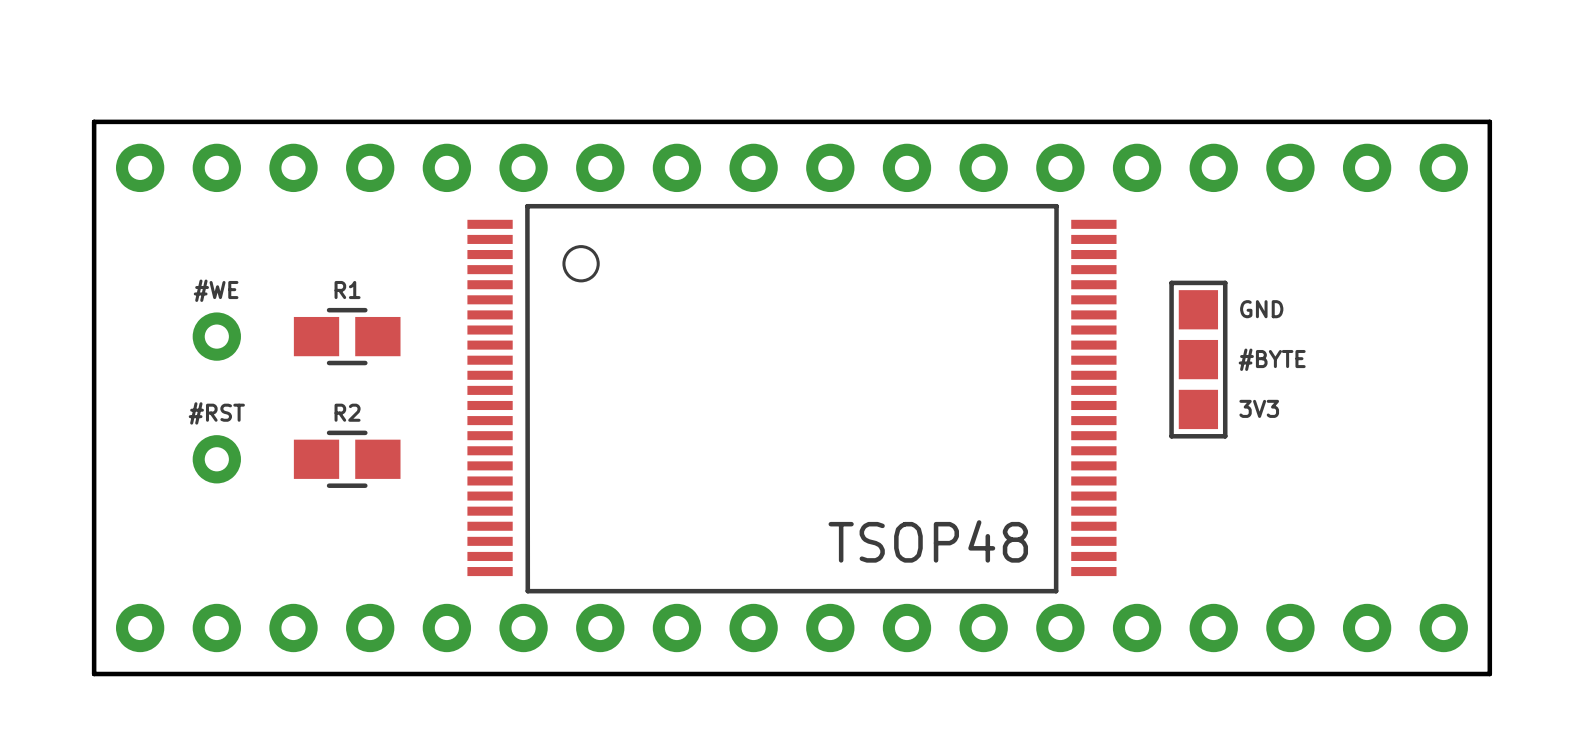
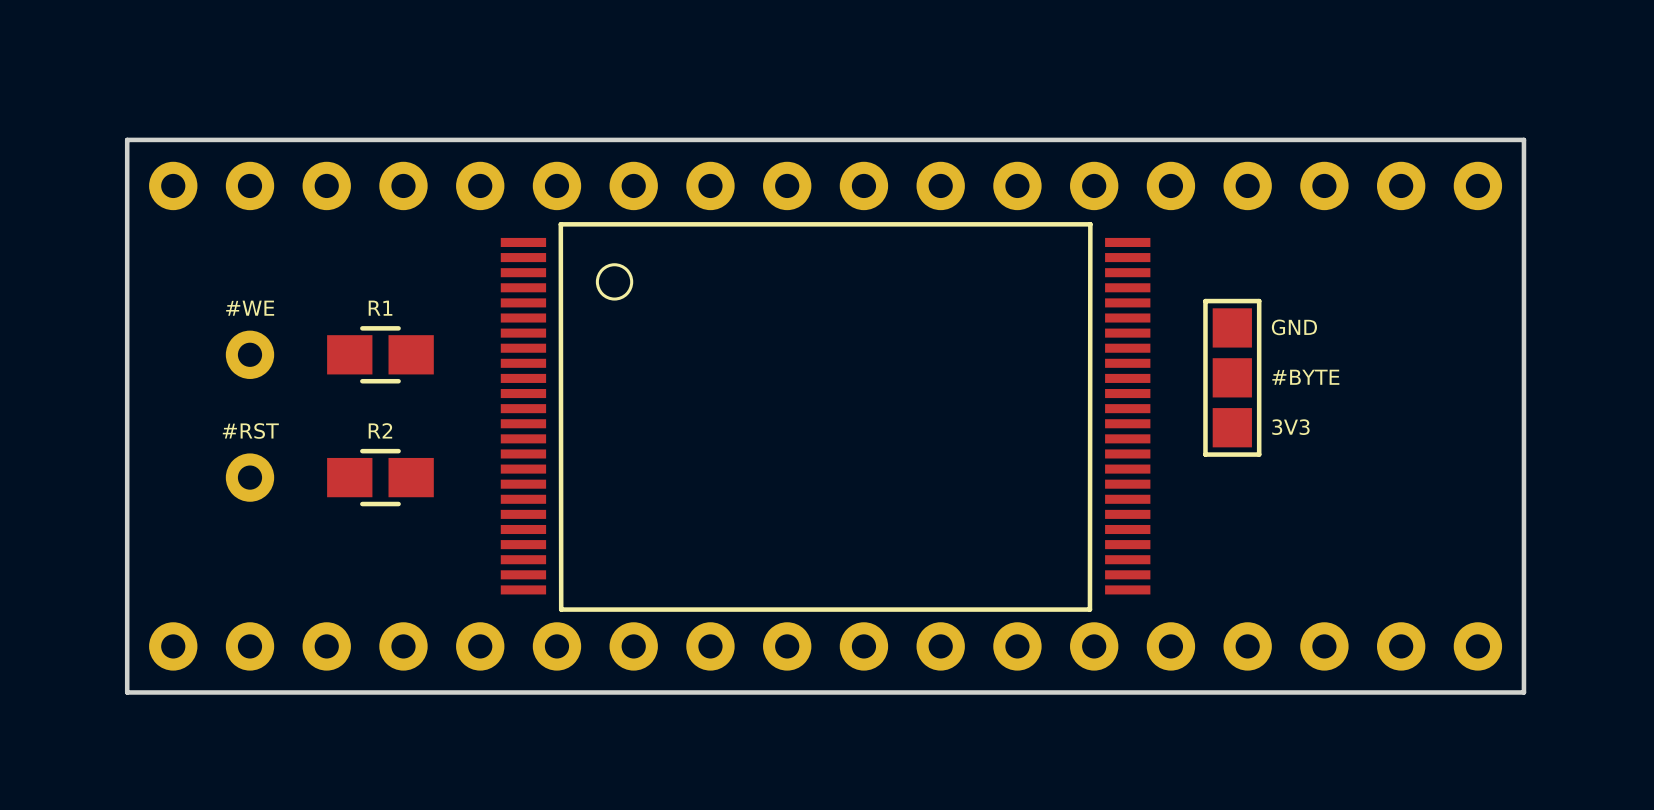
part value: TSOP48 (928, 541) -> none

